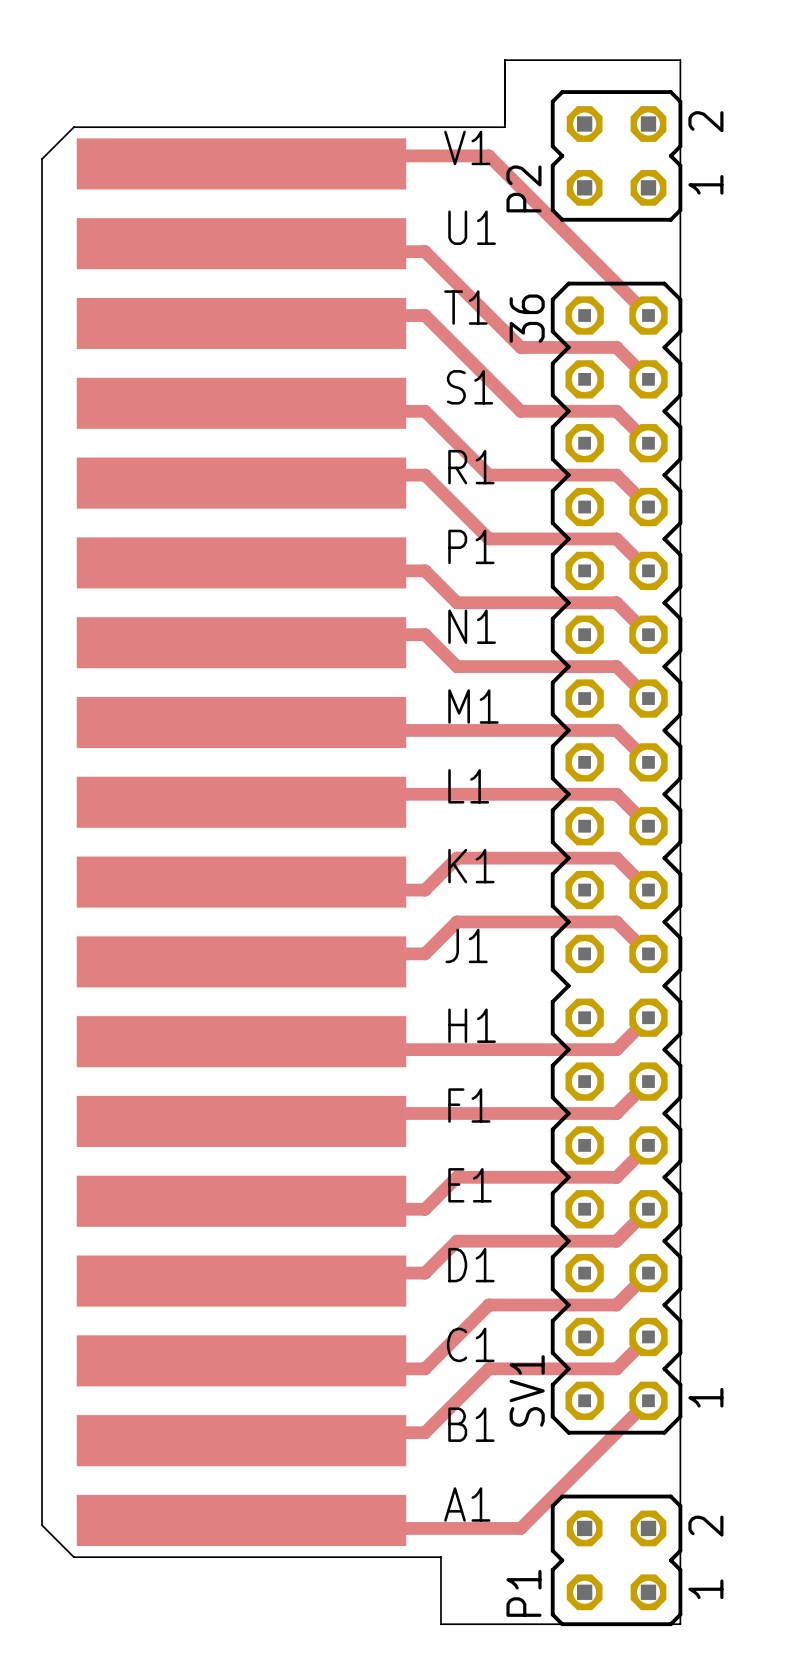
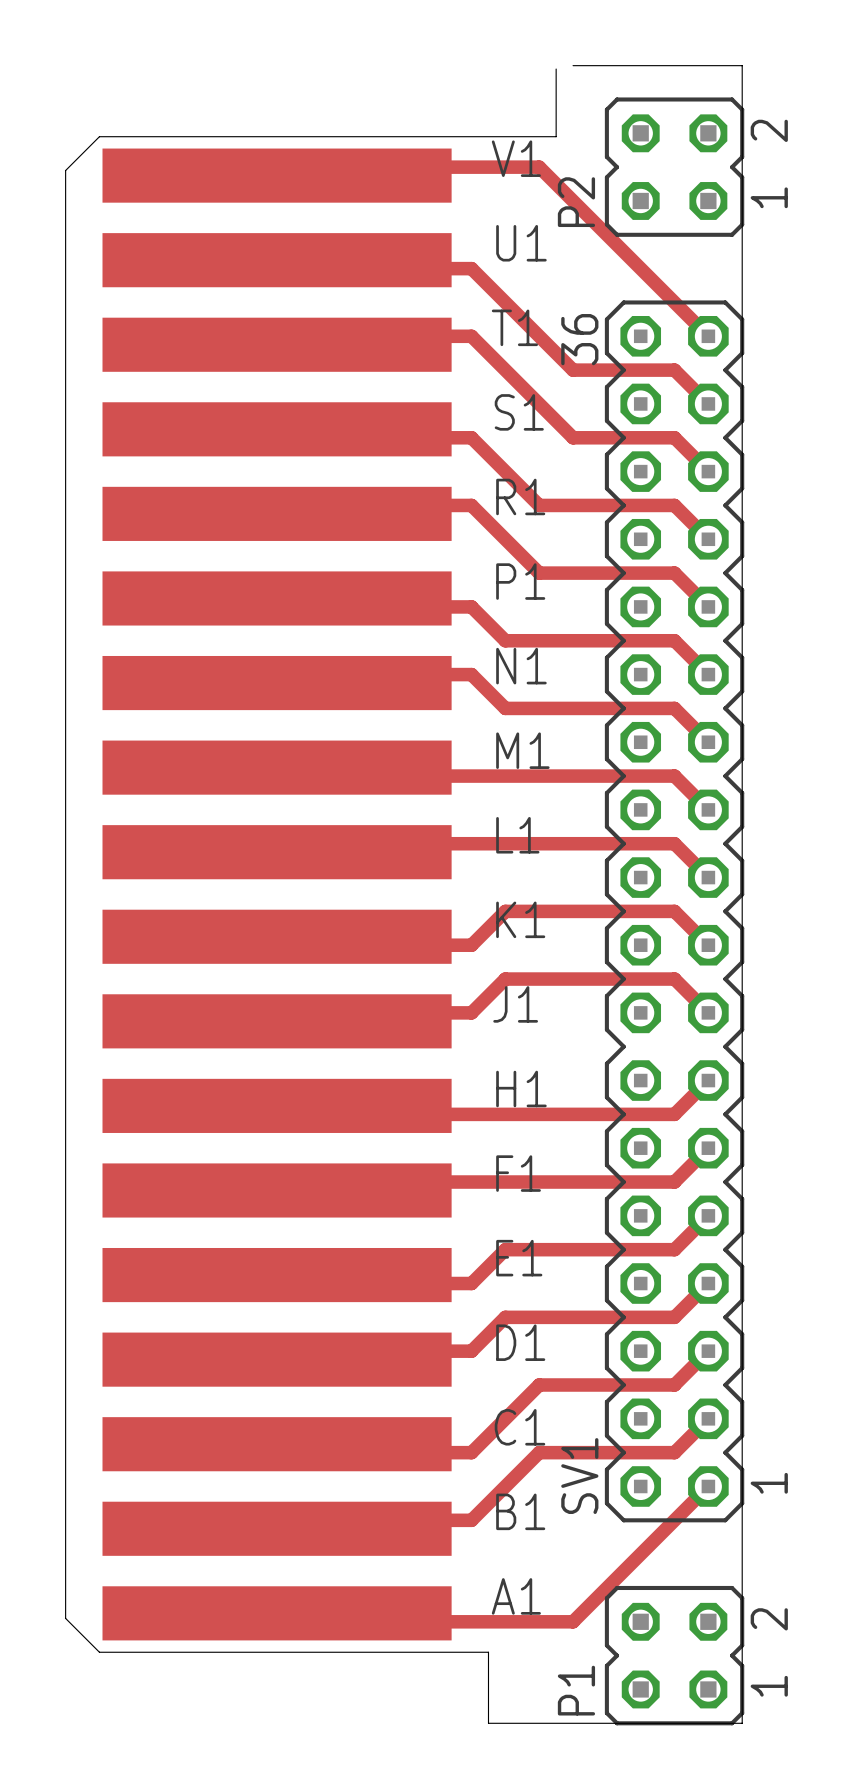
board edge: (520, 60) (504, 60) (504, 123) -> none

